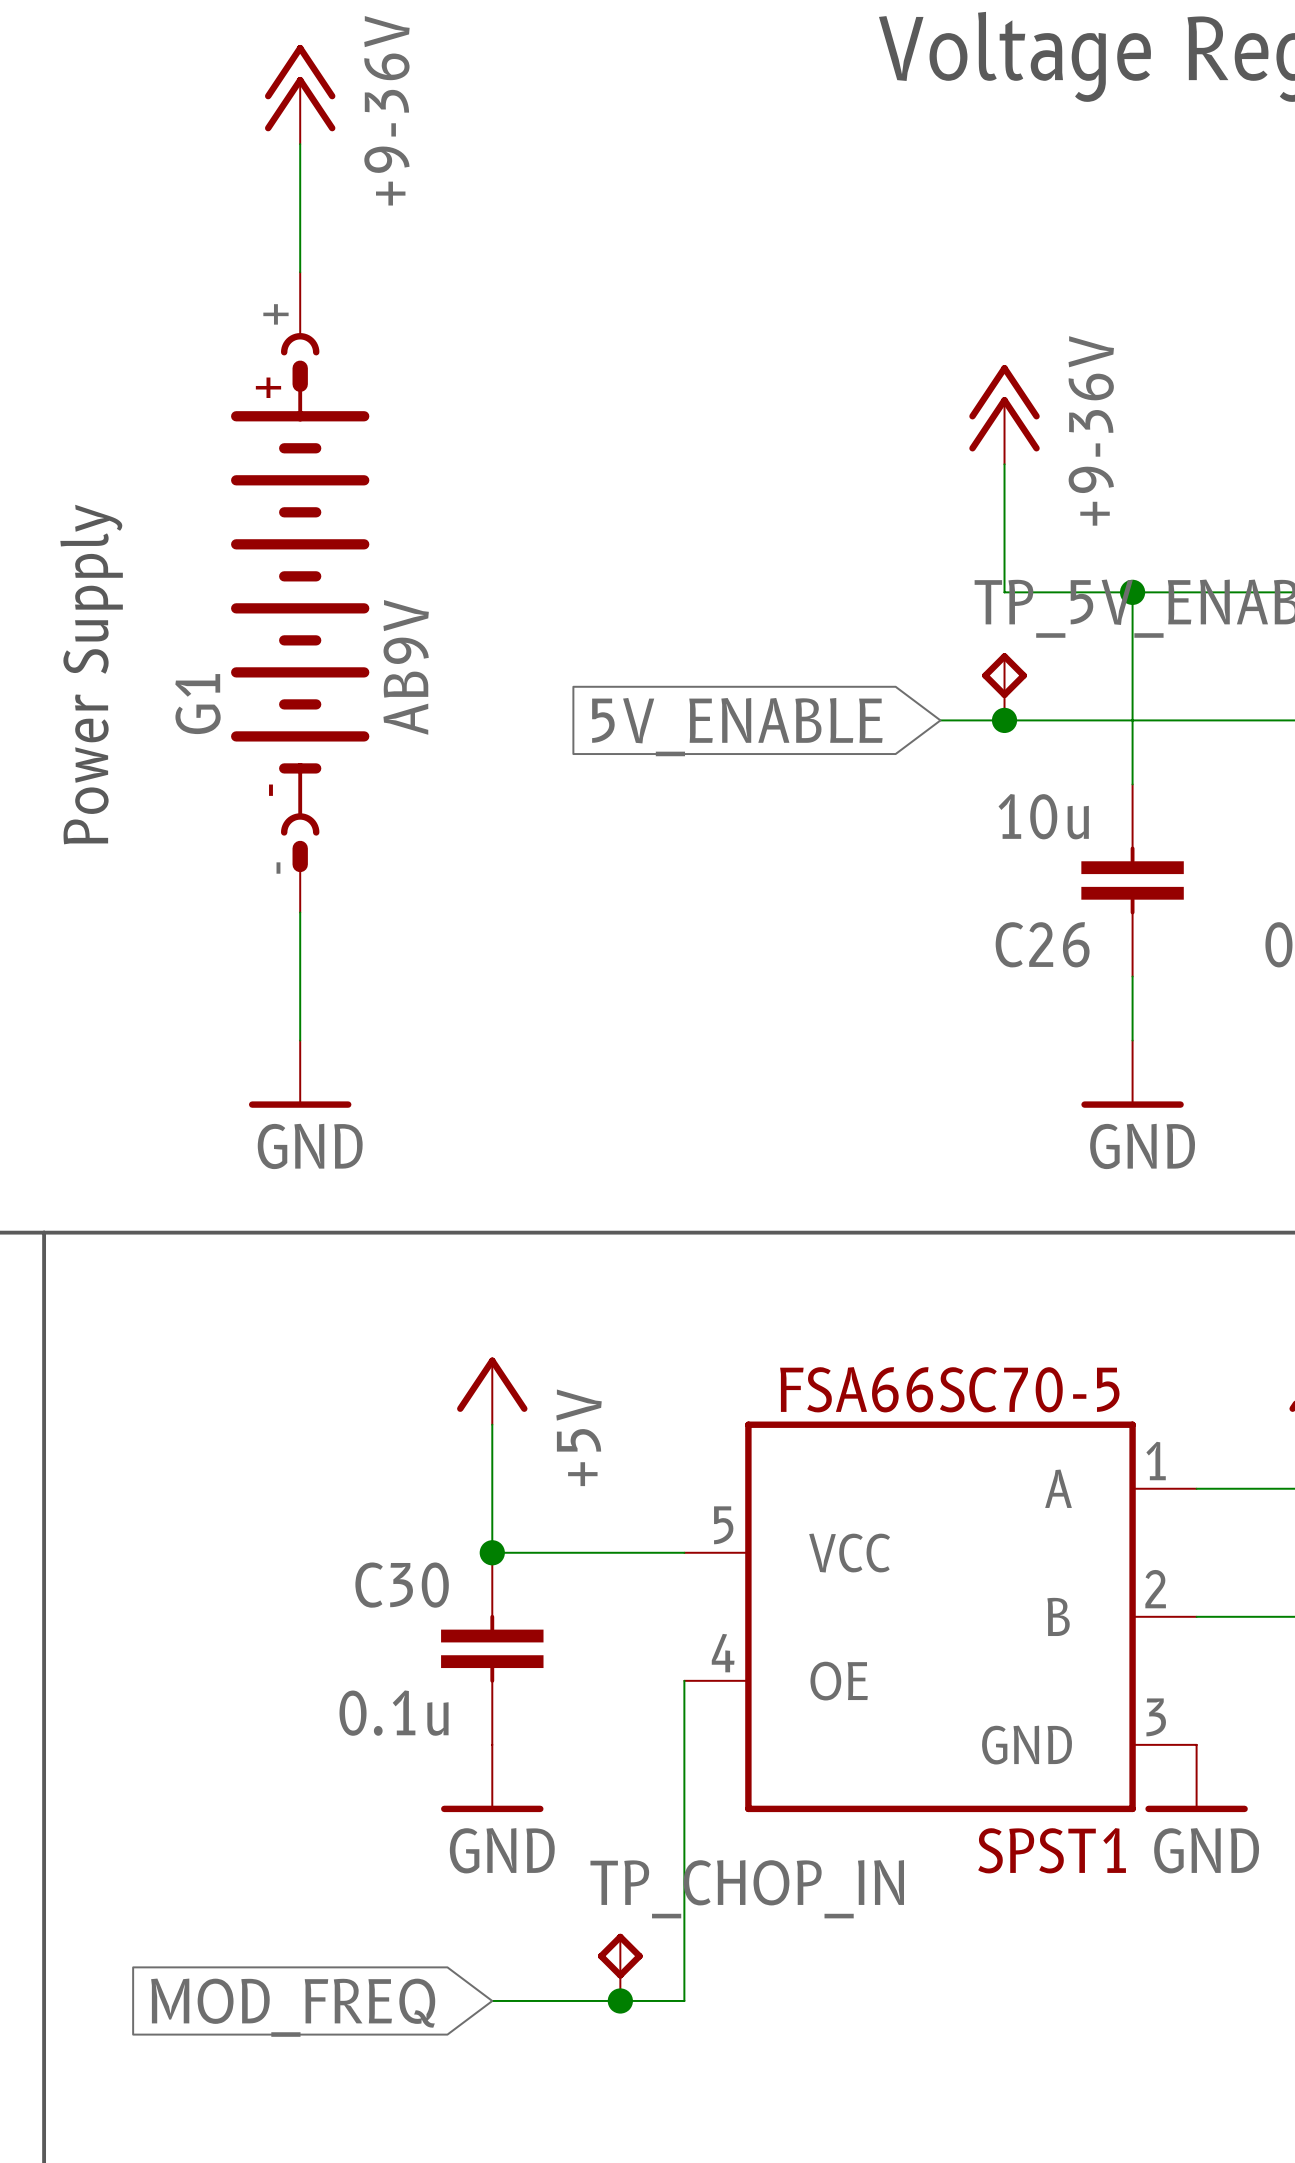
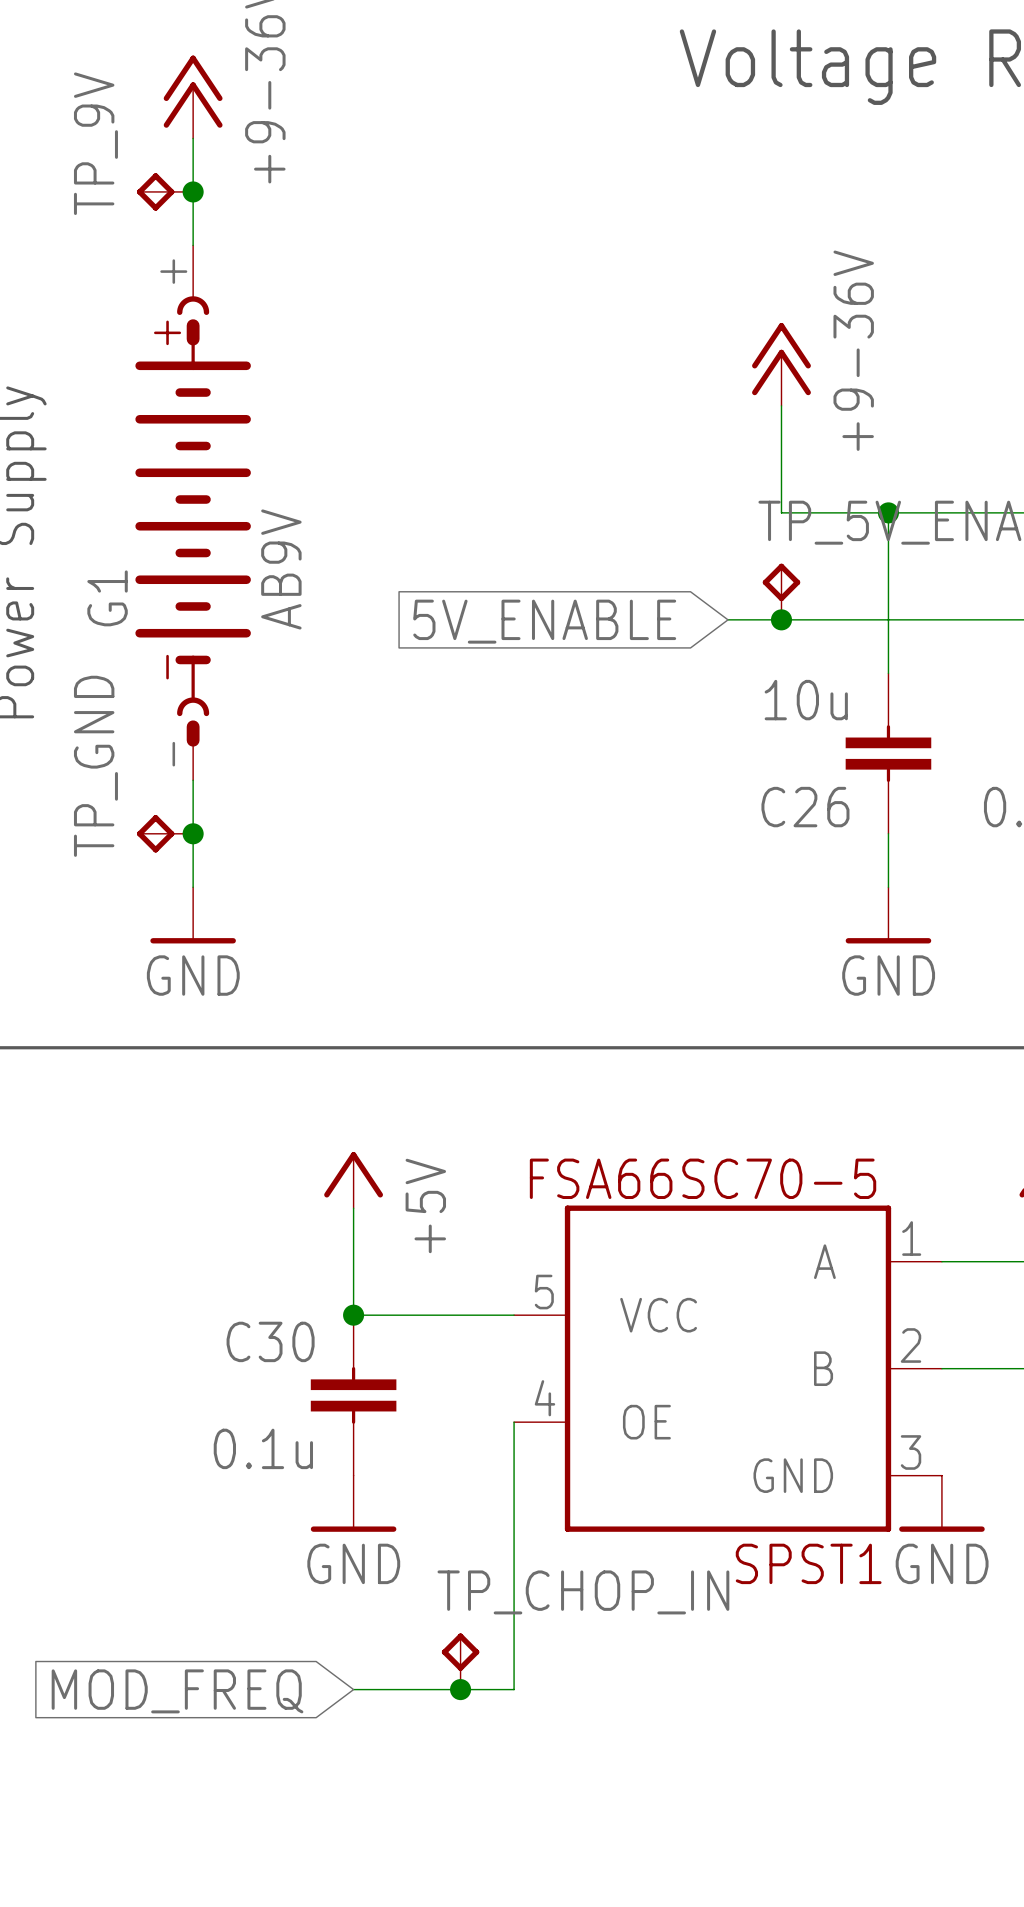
TP_9V: none -> (165, 191)
junction: none -> (193, 191)
TP_GND: none -> (165, 833)
junction: none -> (193, 833)

